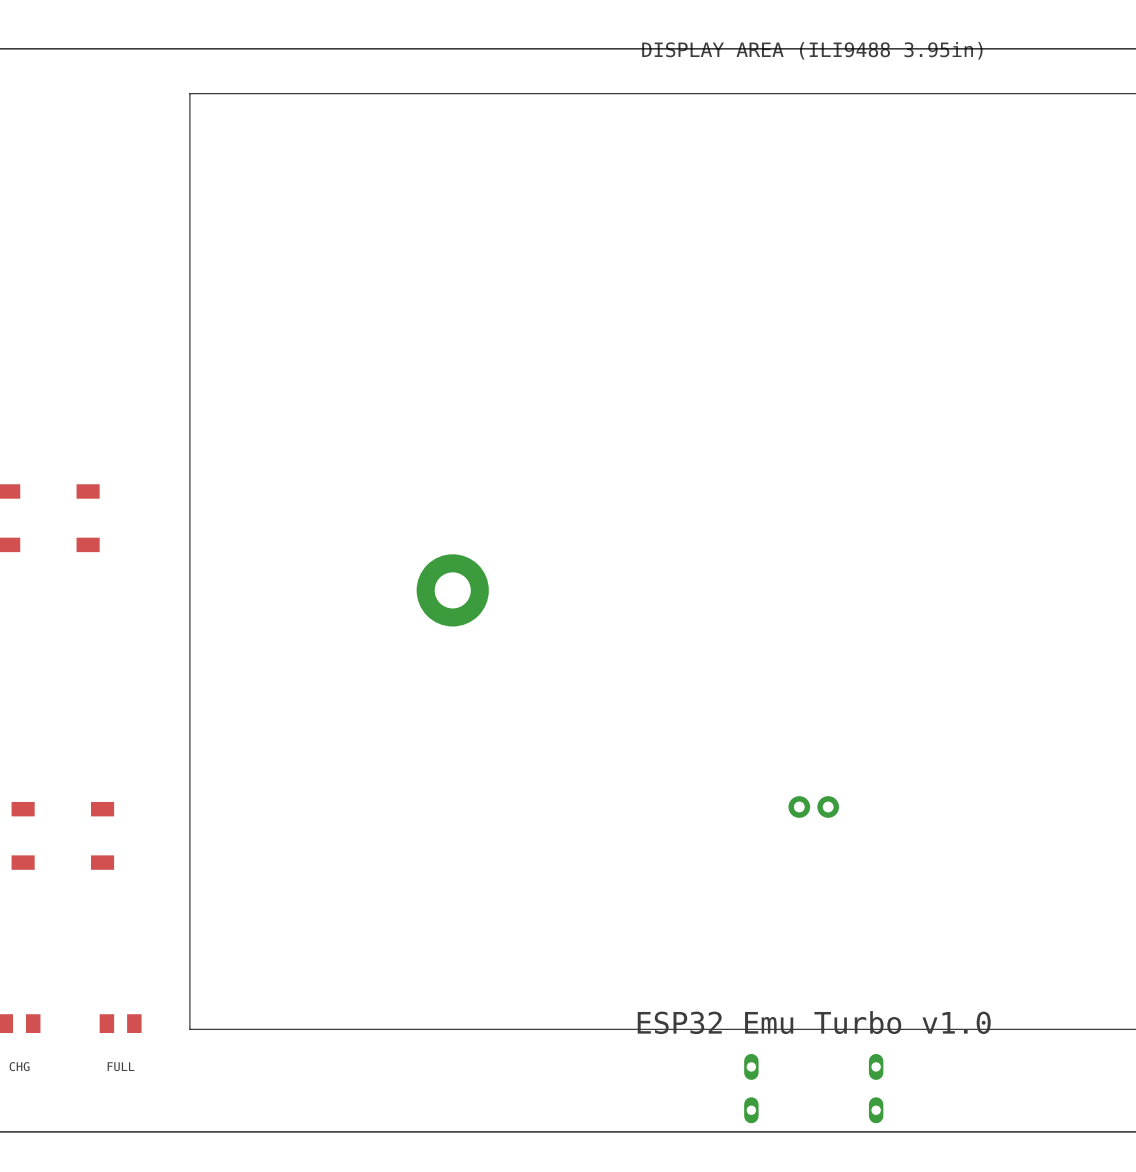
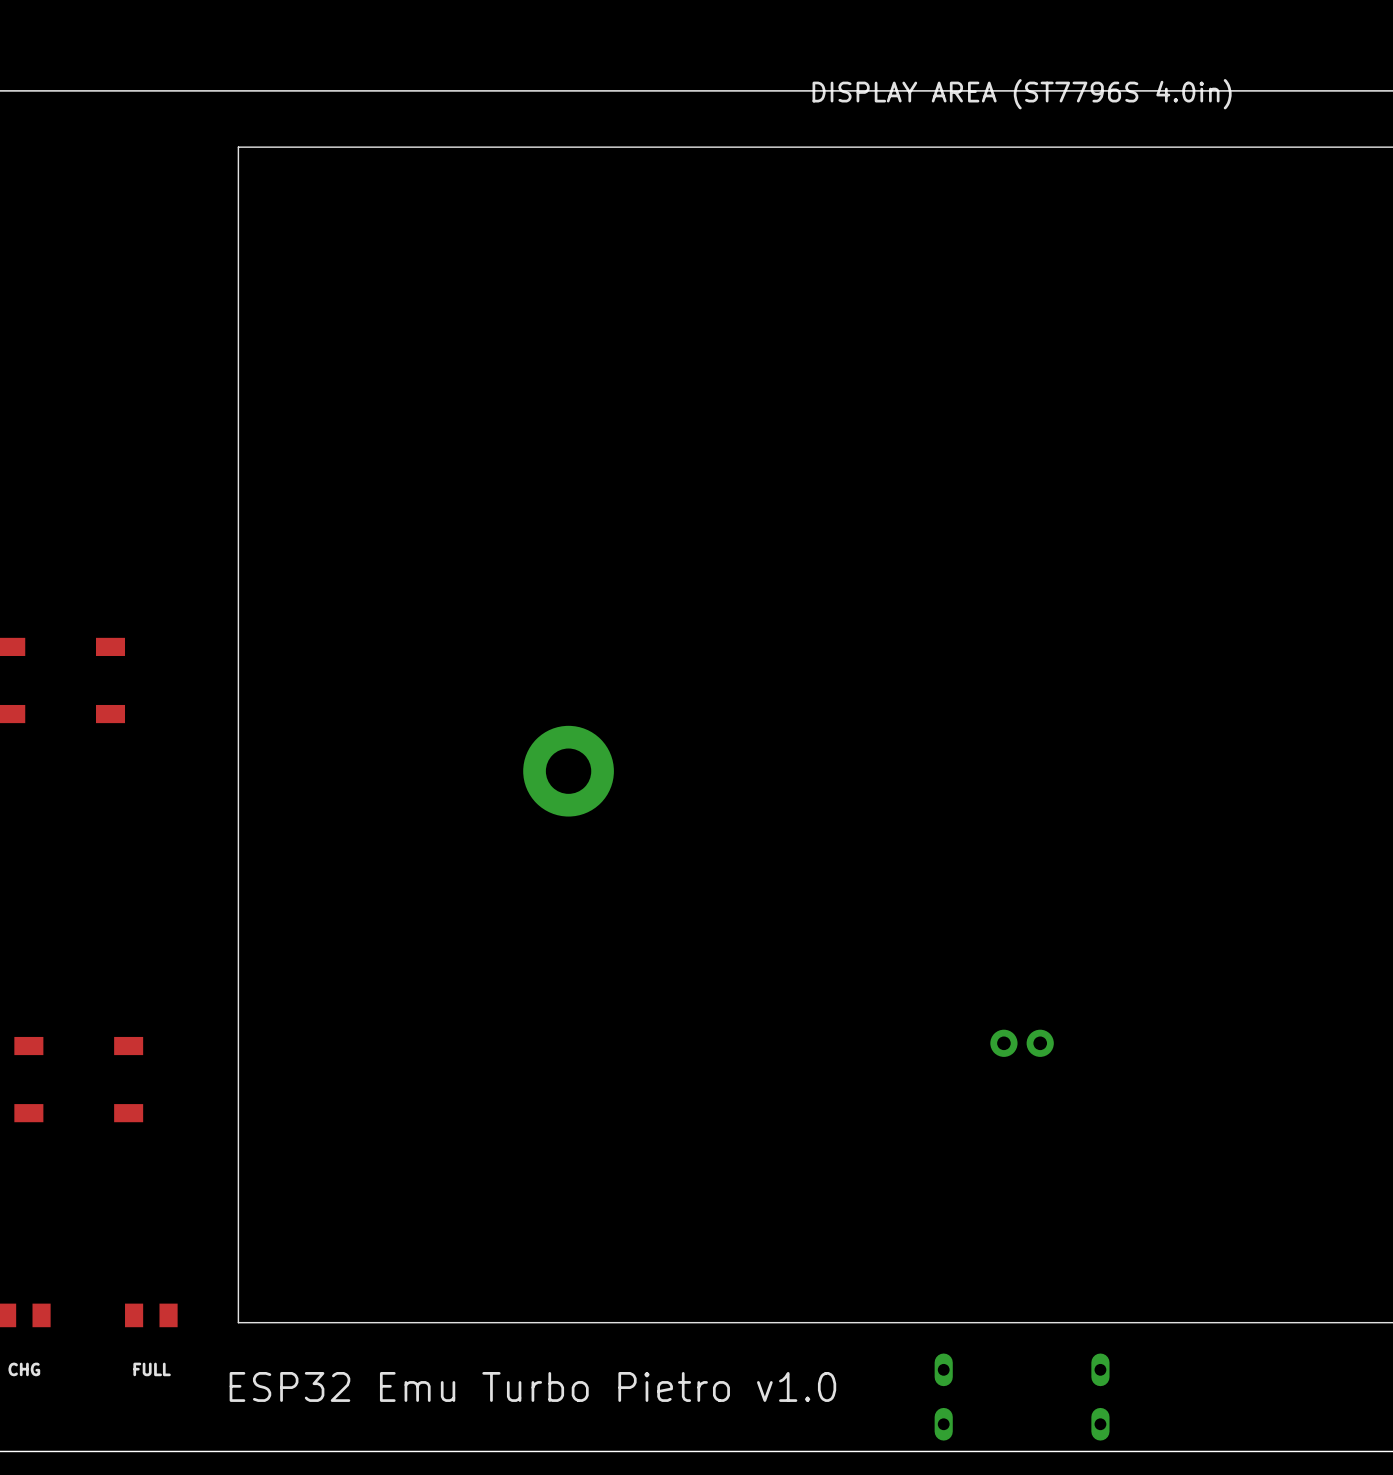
text: DISPLAY AREA (ILI9488 3.95in) (812, 50) -> DISPLAY AREA (ST7796S 4.0in) (1022, 94)
text: ESP32 Emu Turbo v1.0 (814, 1022) -> none
text: none -> ESP32 Emu Turbo Pietro v1.0 (532, 1386)

